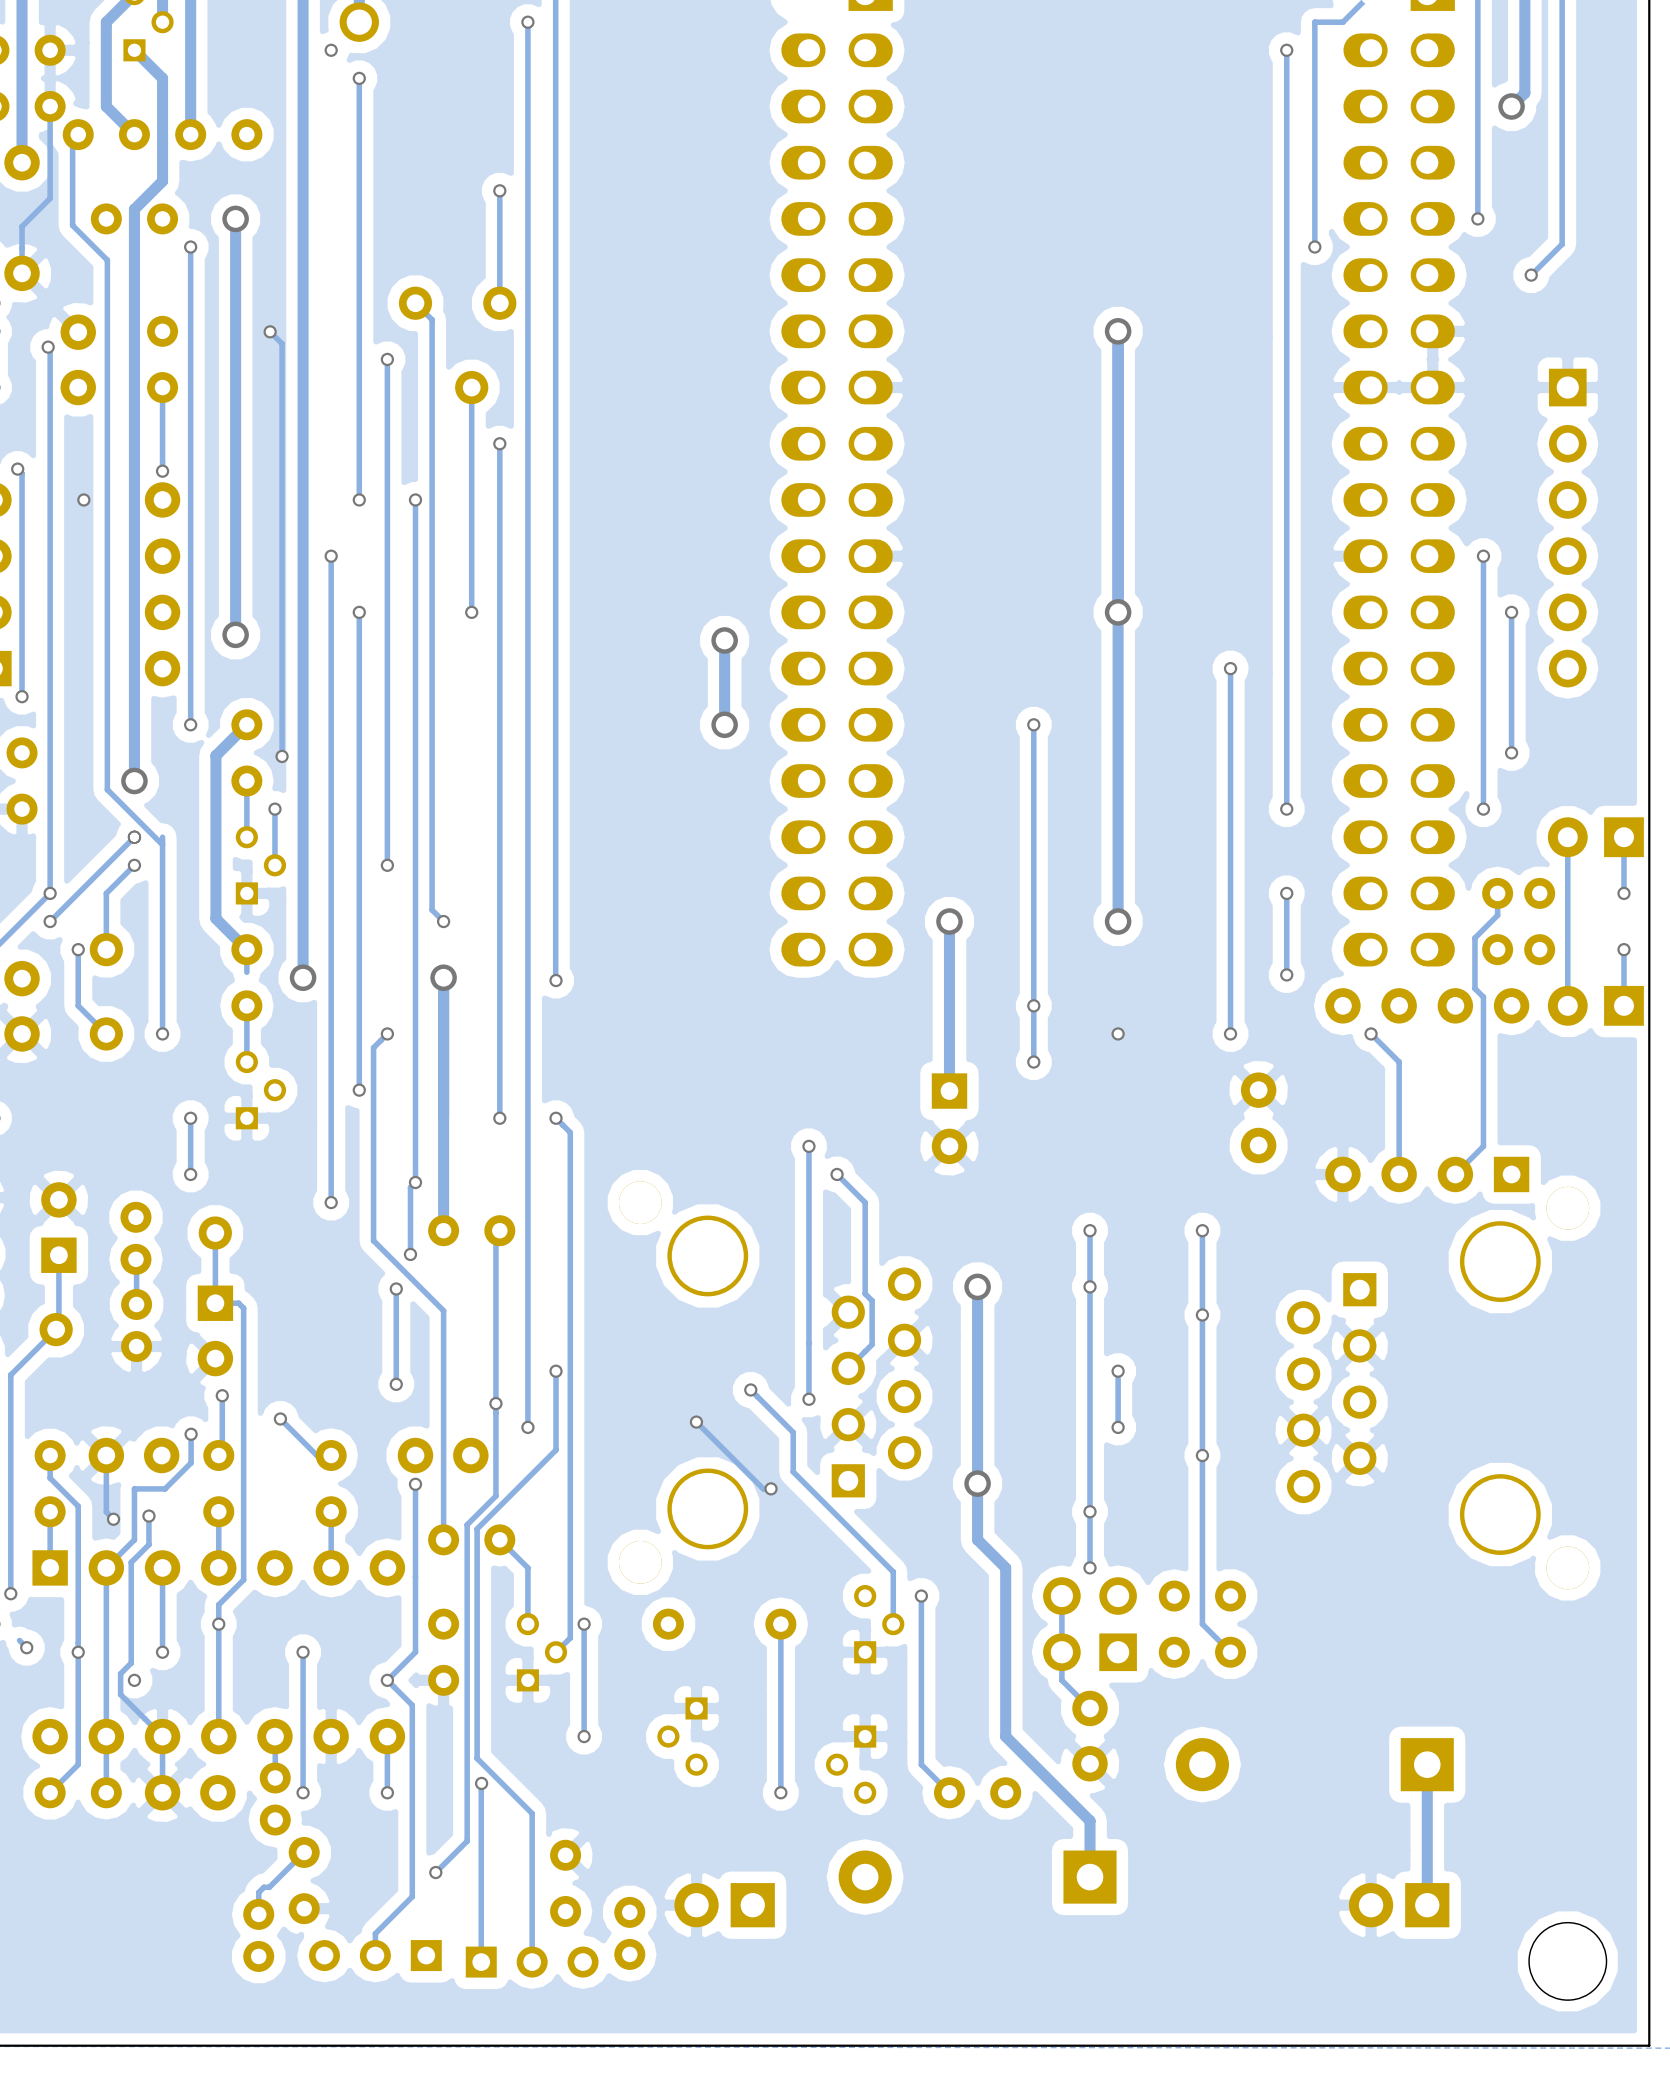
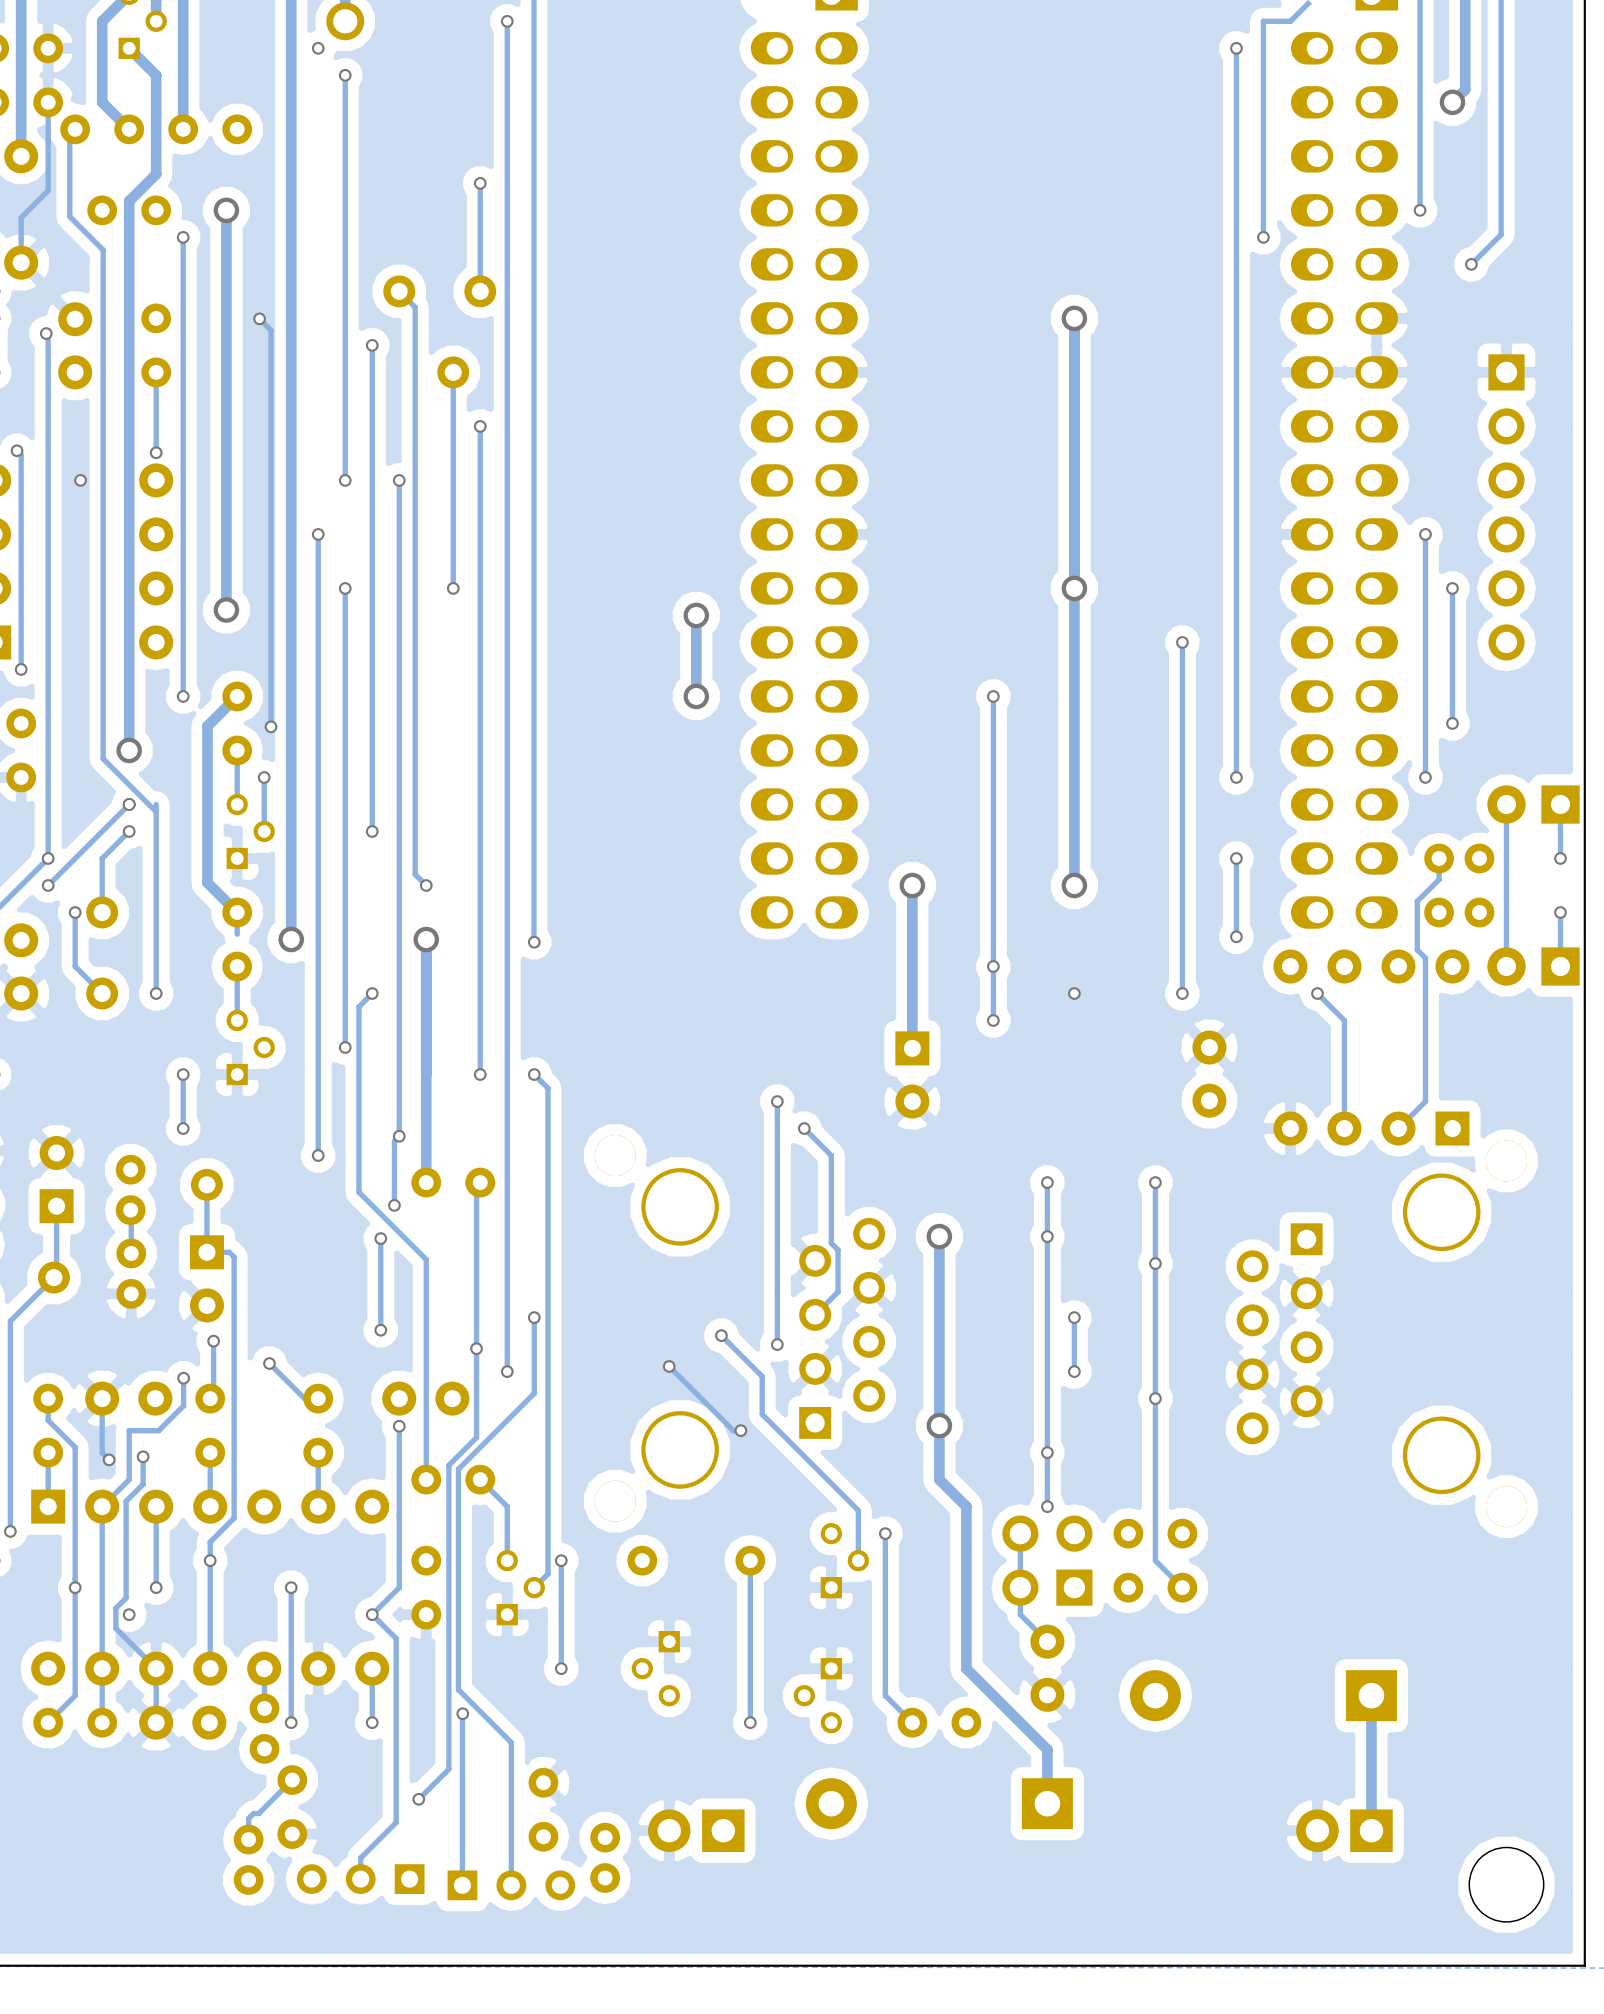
track: (19, 1640) (26, 1647) -> none
via: (26, 1647) -> none

